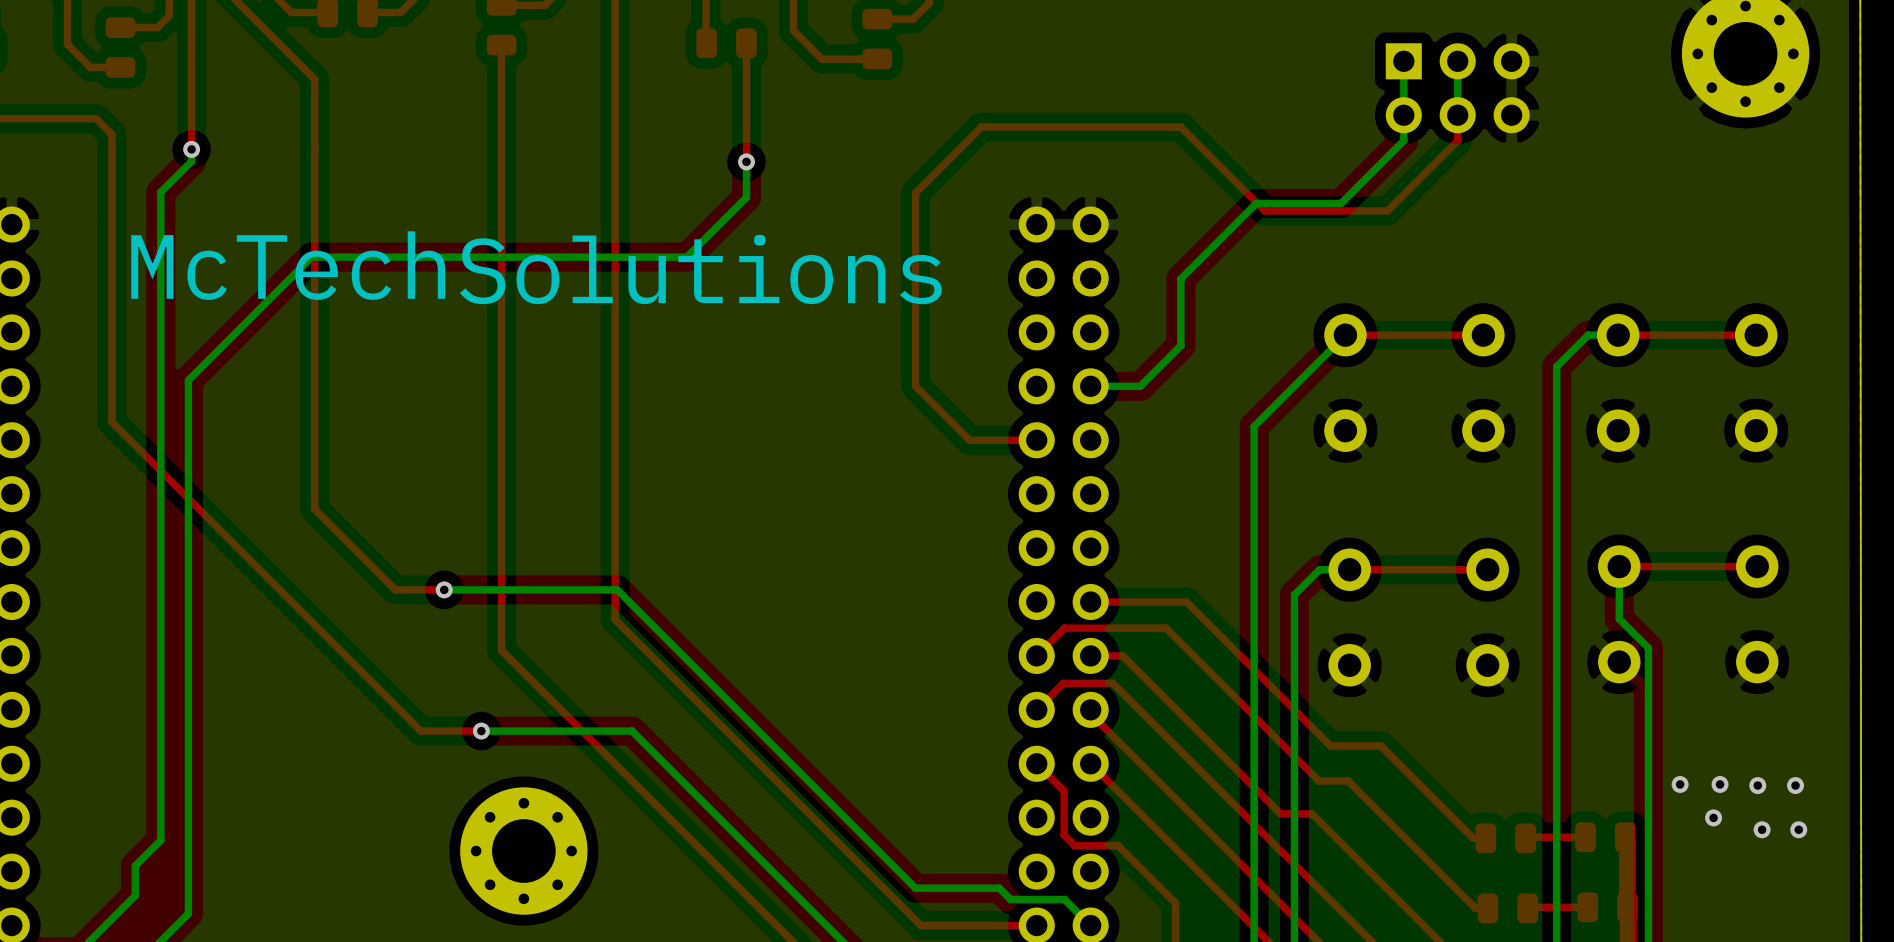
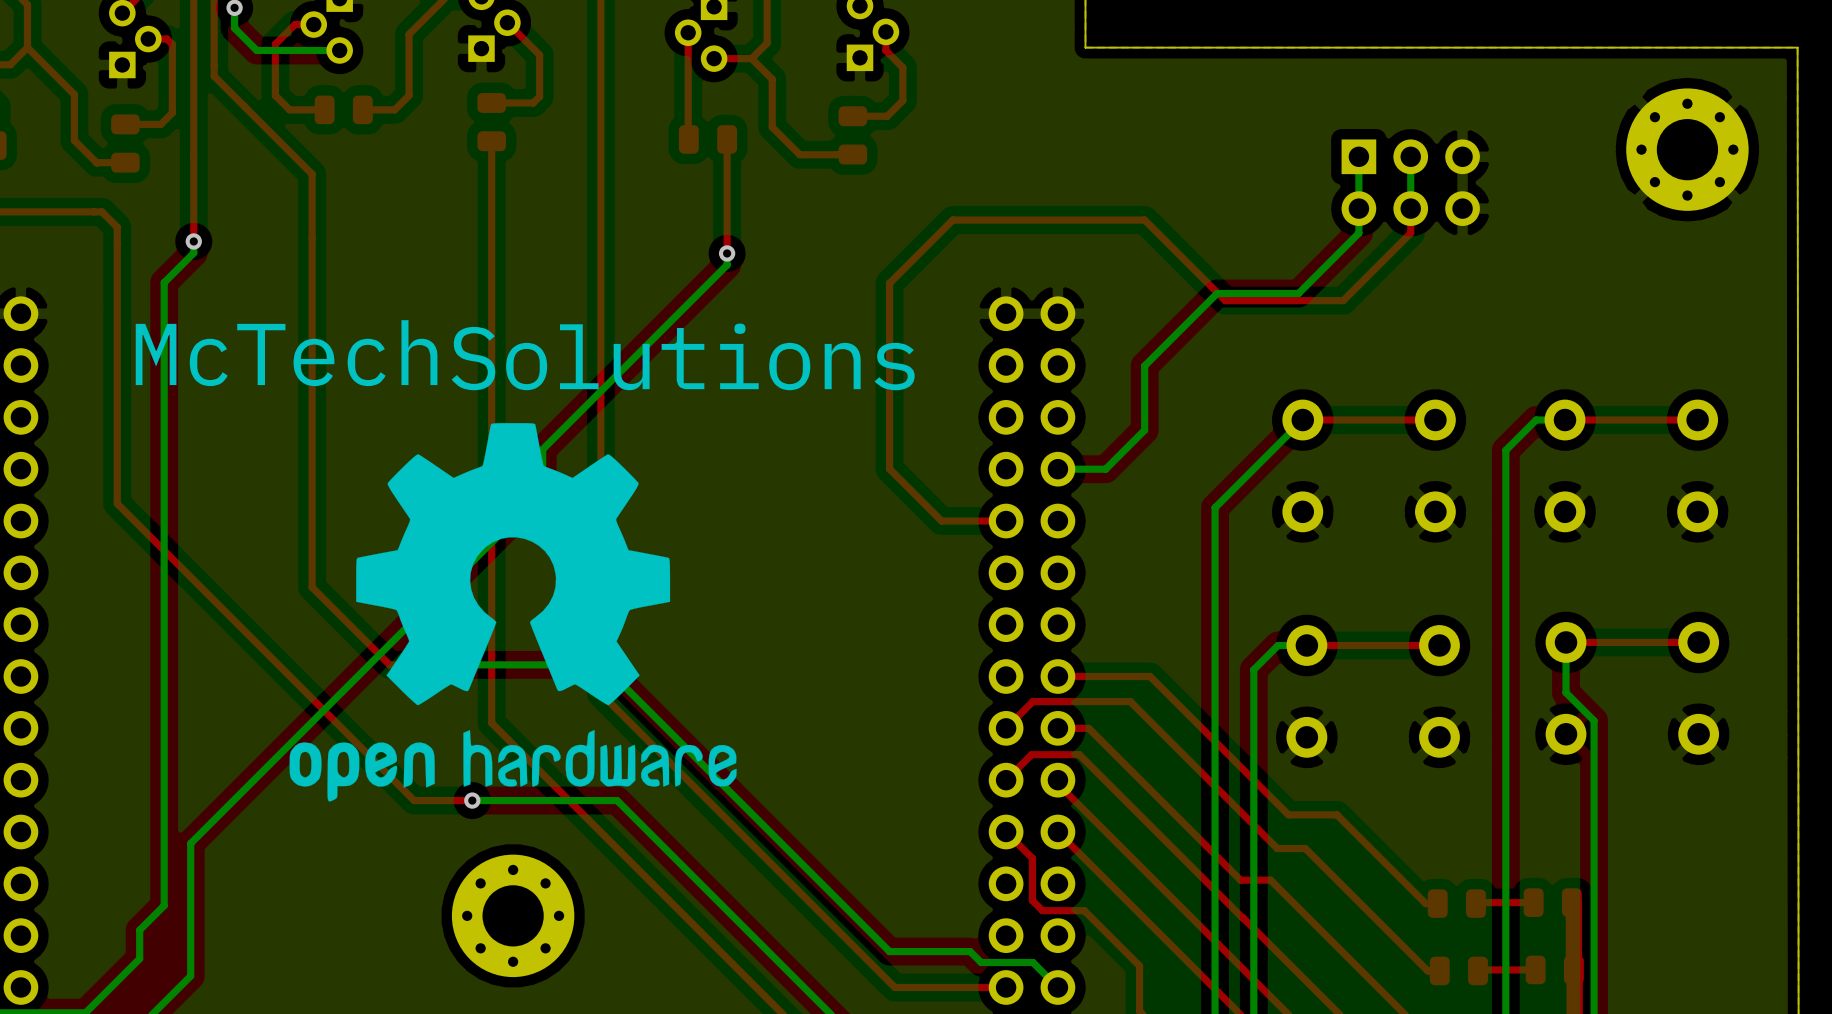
bottom track: (746, 173) (746, 197) (686, 257) (311, 257) (188, 380) (188, 775) -> (727, 265) (542, 449) (542, 491) (190, 843)
drawing: none -> [289, 423, 737, 802]
via: (1680, 784) -> none
via: (1720, 784) -> none
via: (1757, 785) -> none
via: (1795, 785) -> none
via: (1713, 817) -> none
via: (1762, 829) -> none
via: (1798, 829) -> none

